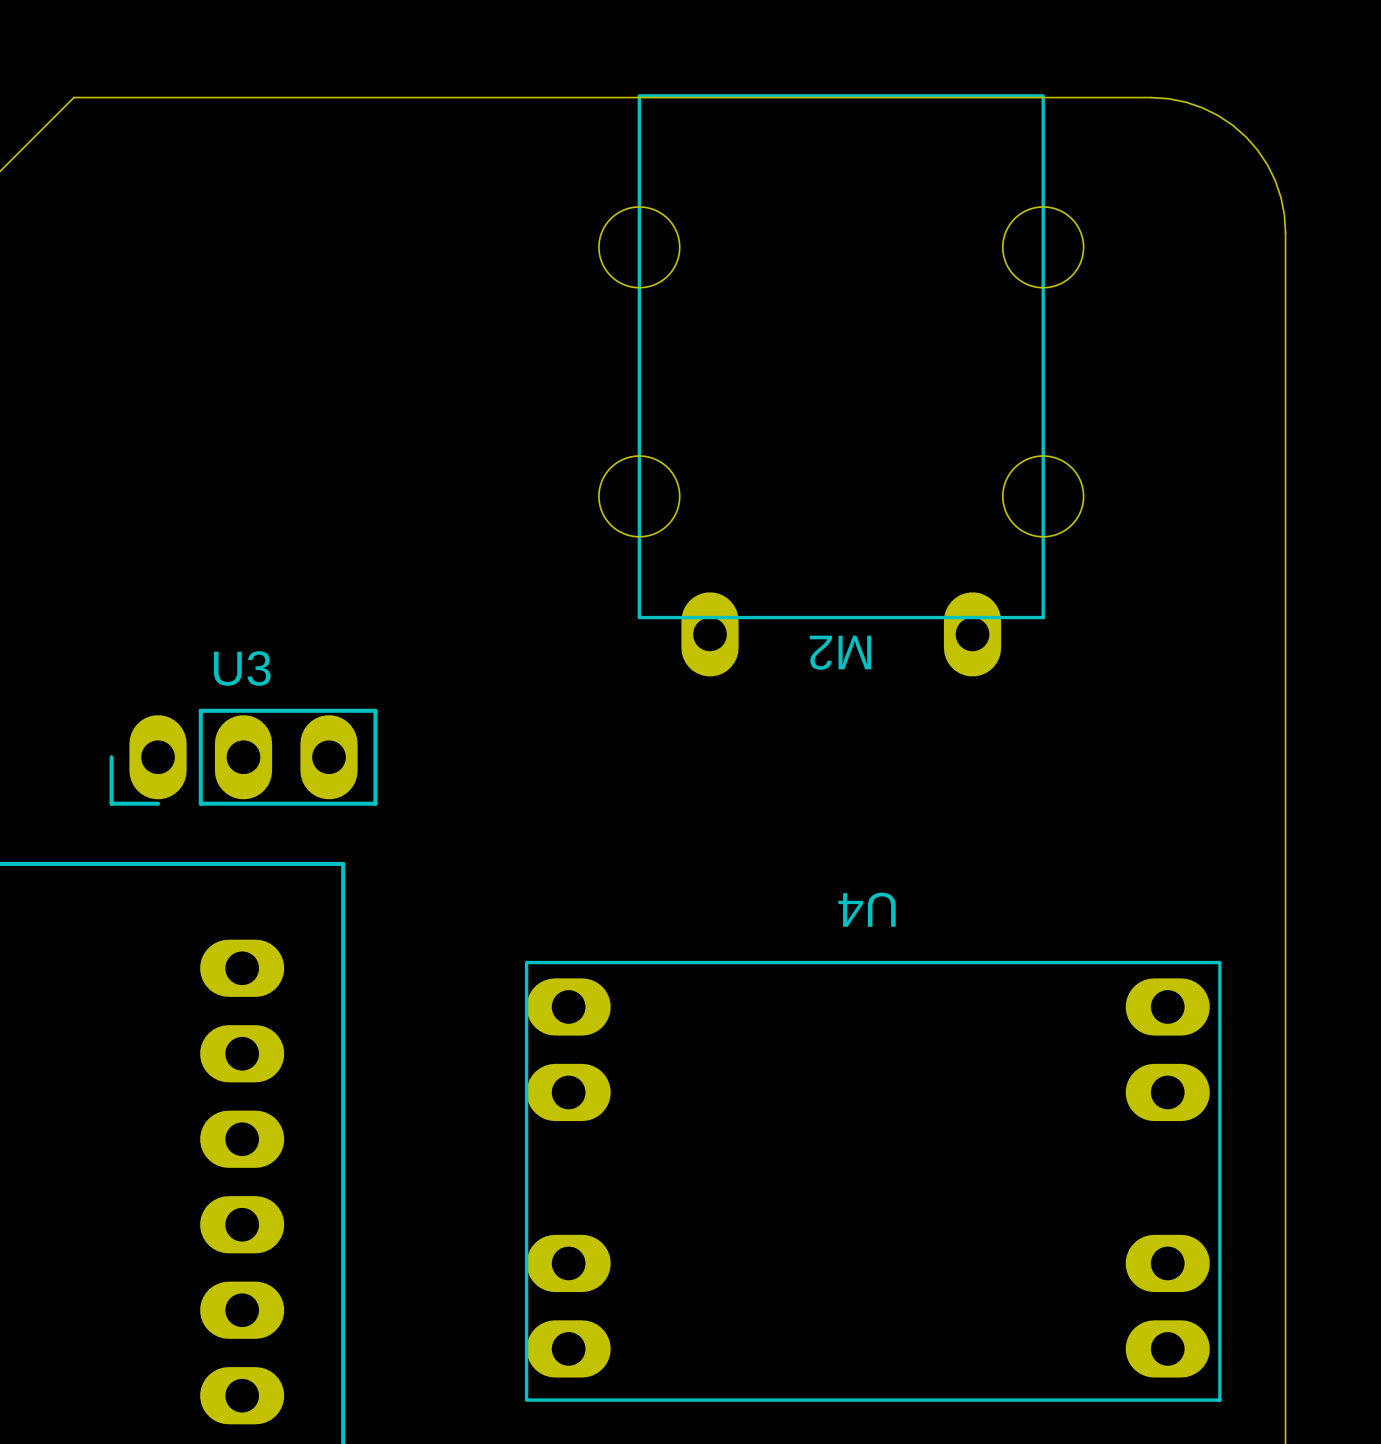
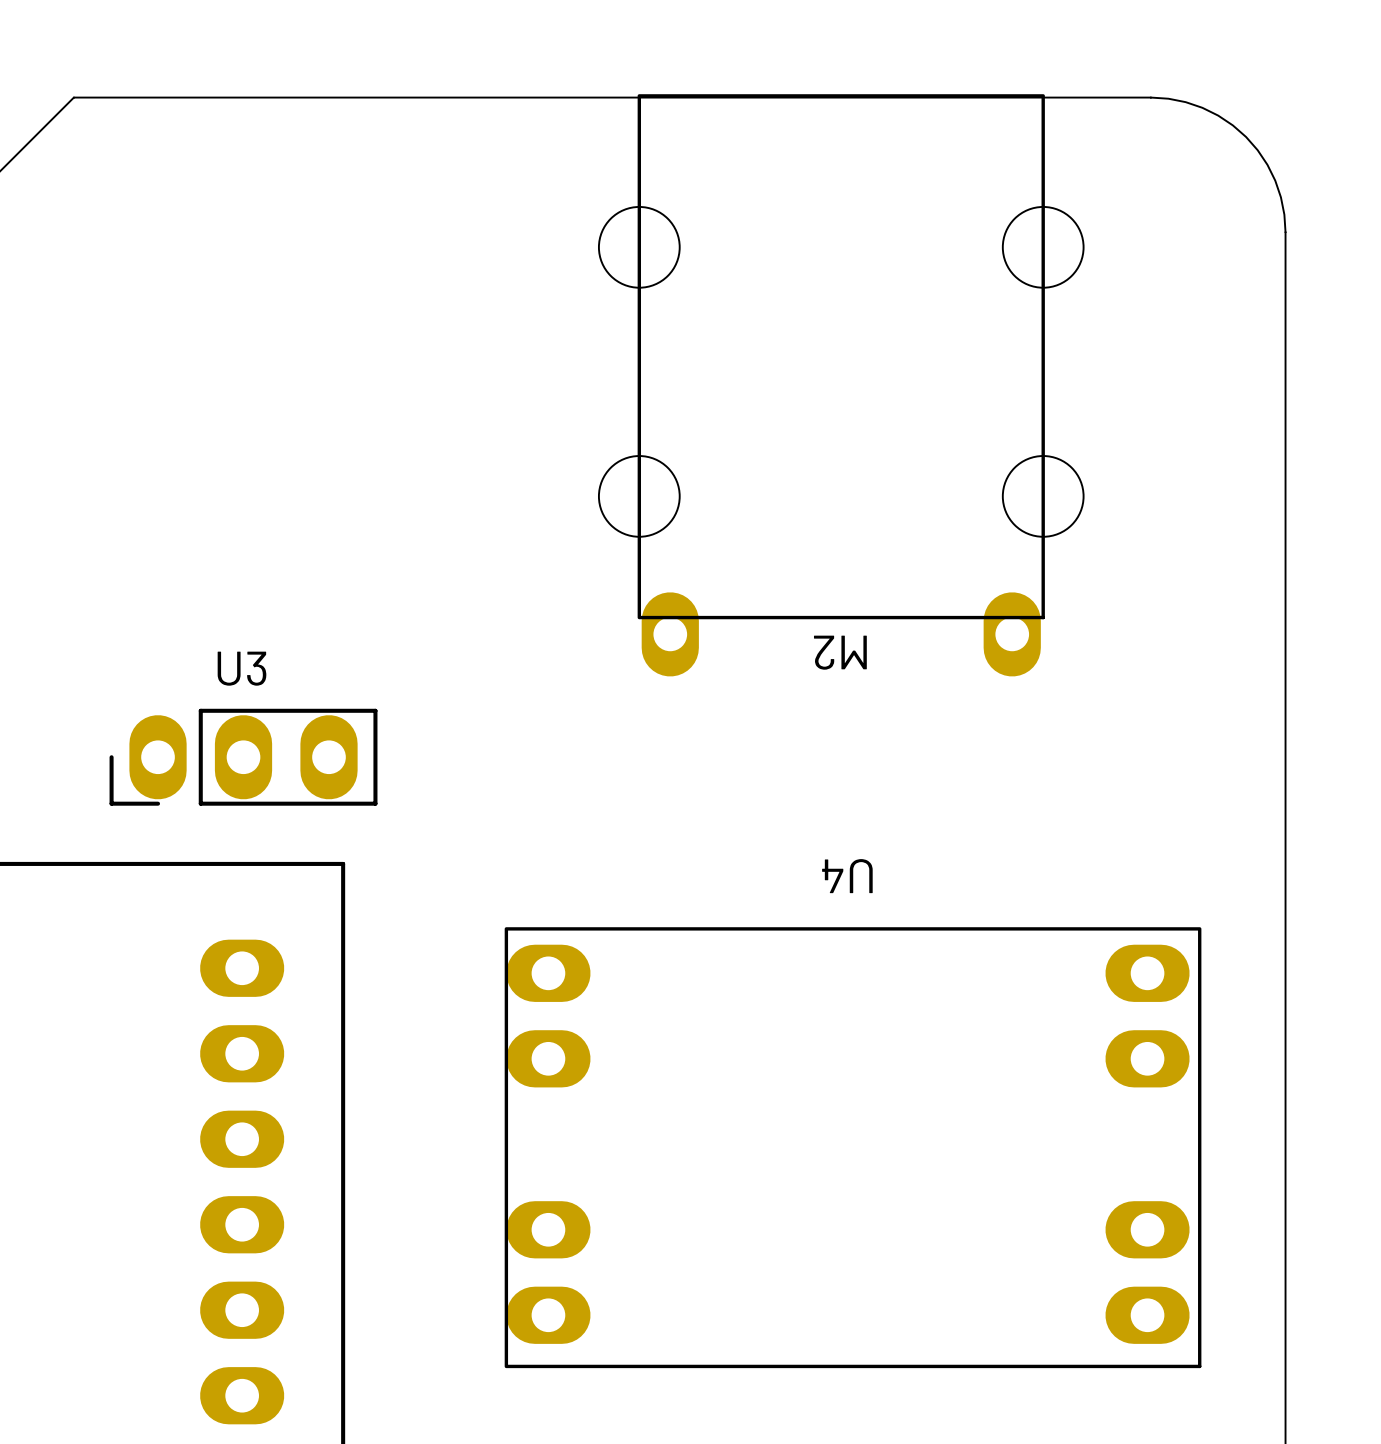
M2 footprint: [598, 94, 1085, 677] -> [598, 94, 1085, 677]
U4 position: (873, 1181) -> (853, 1147)

